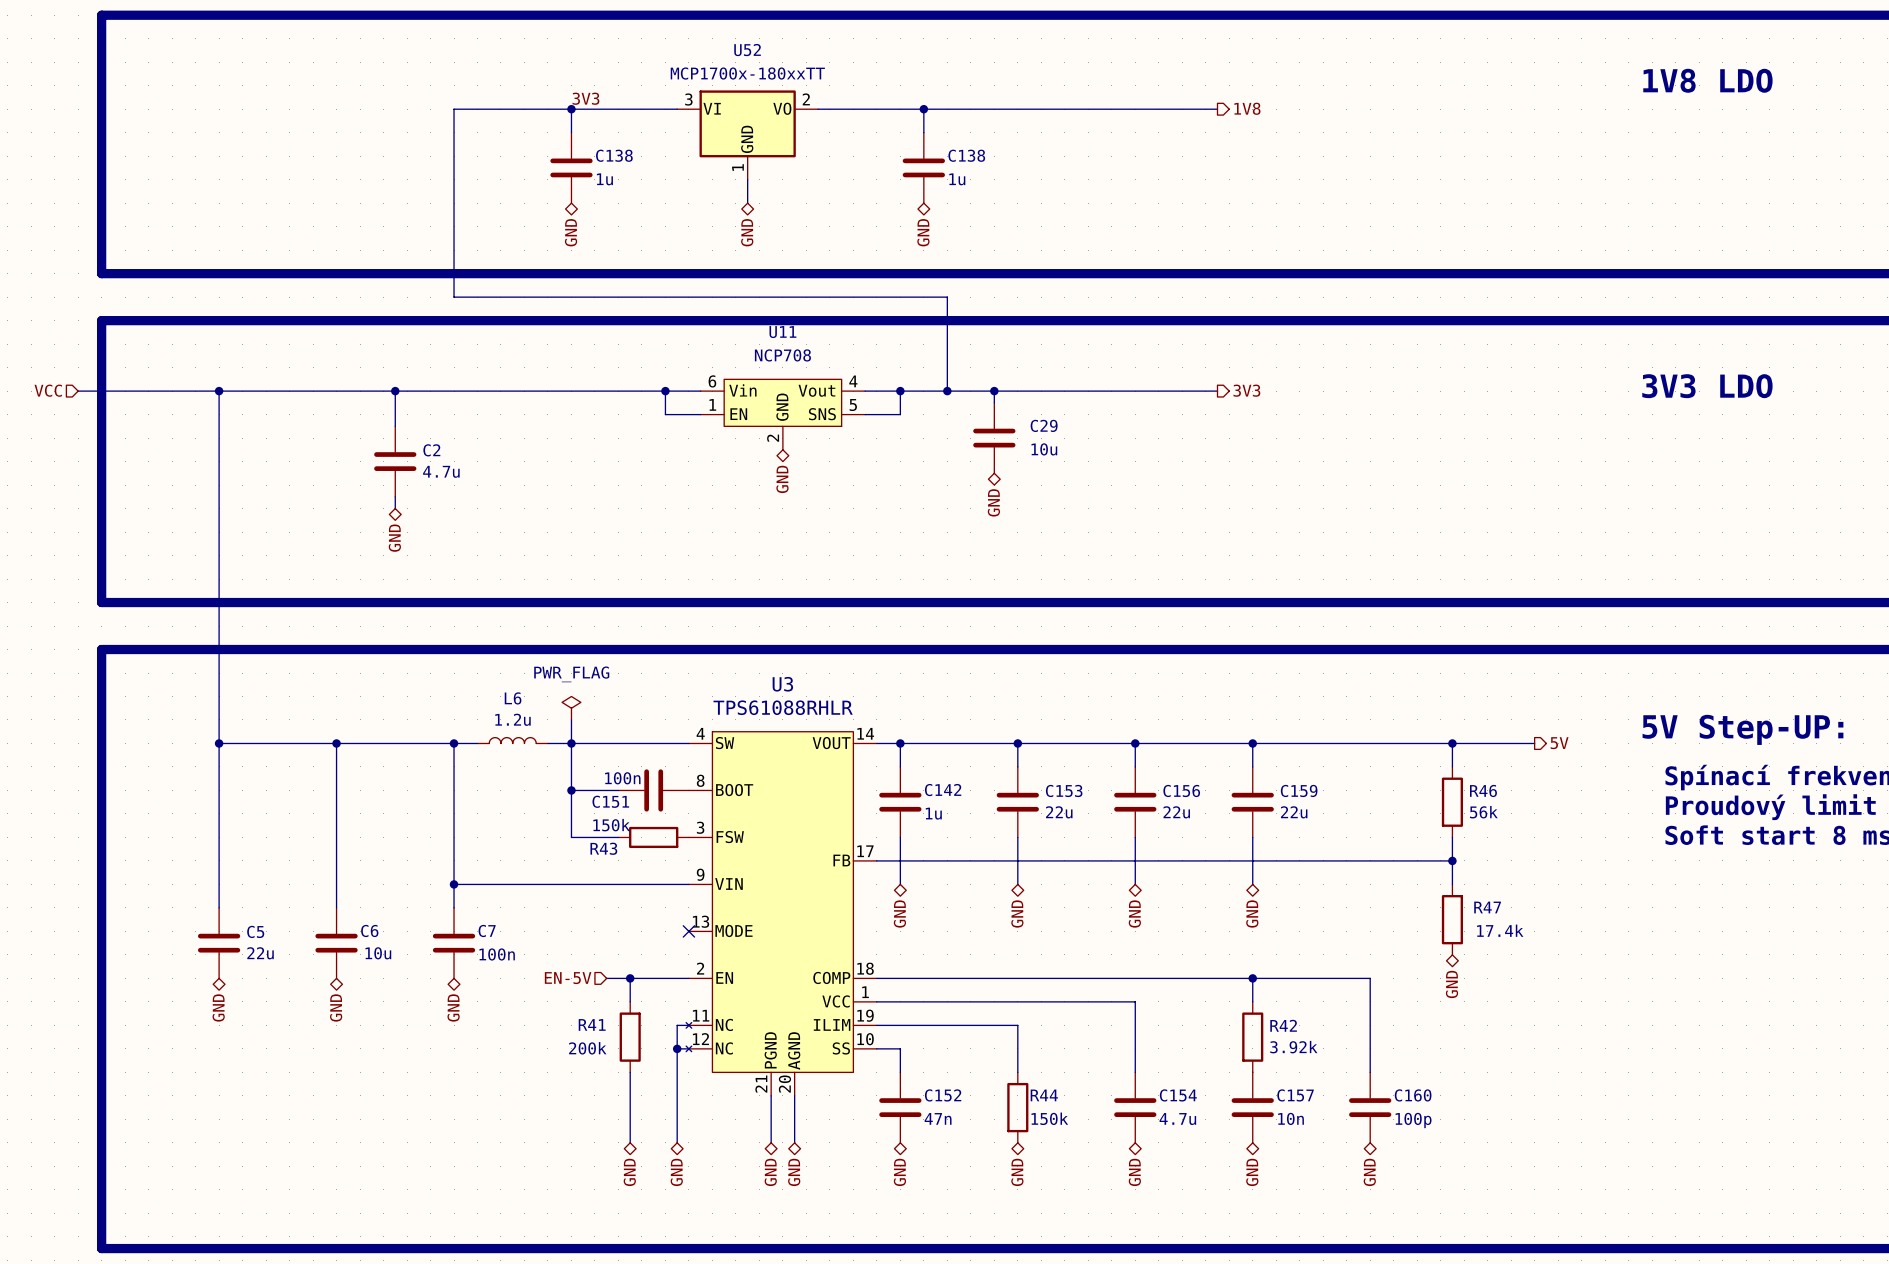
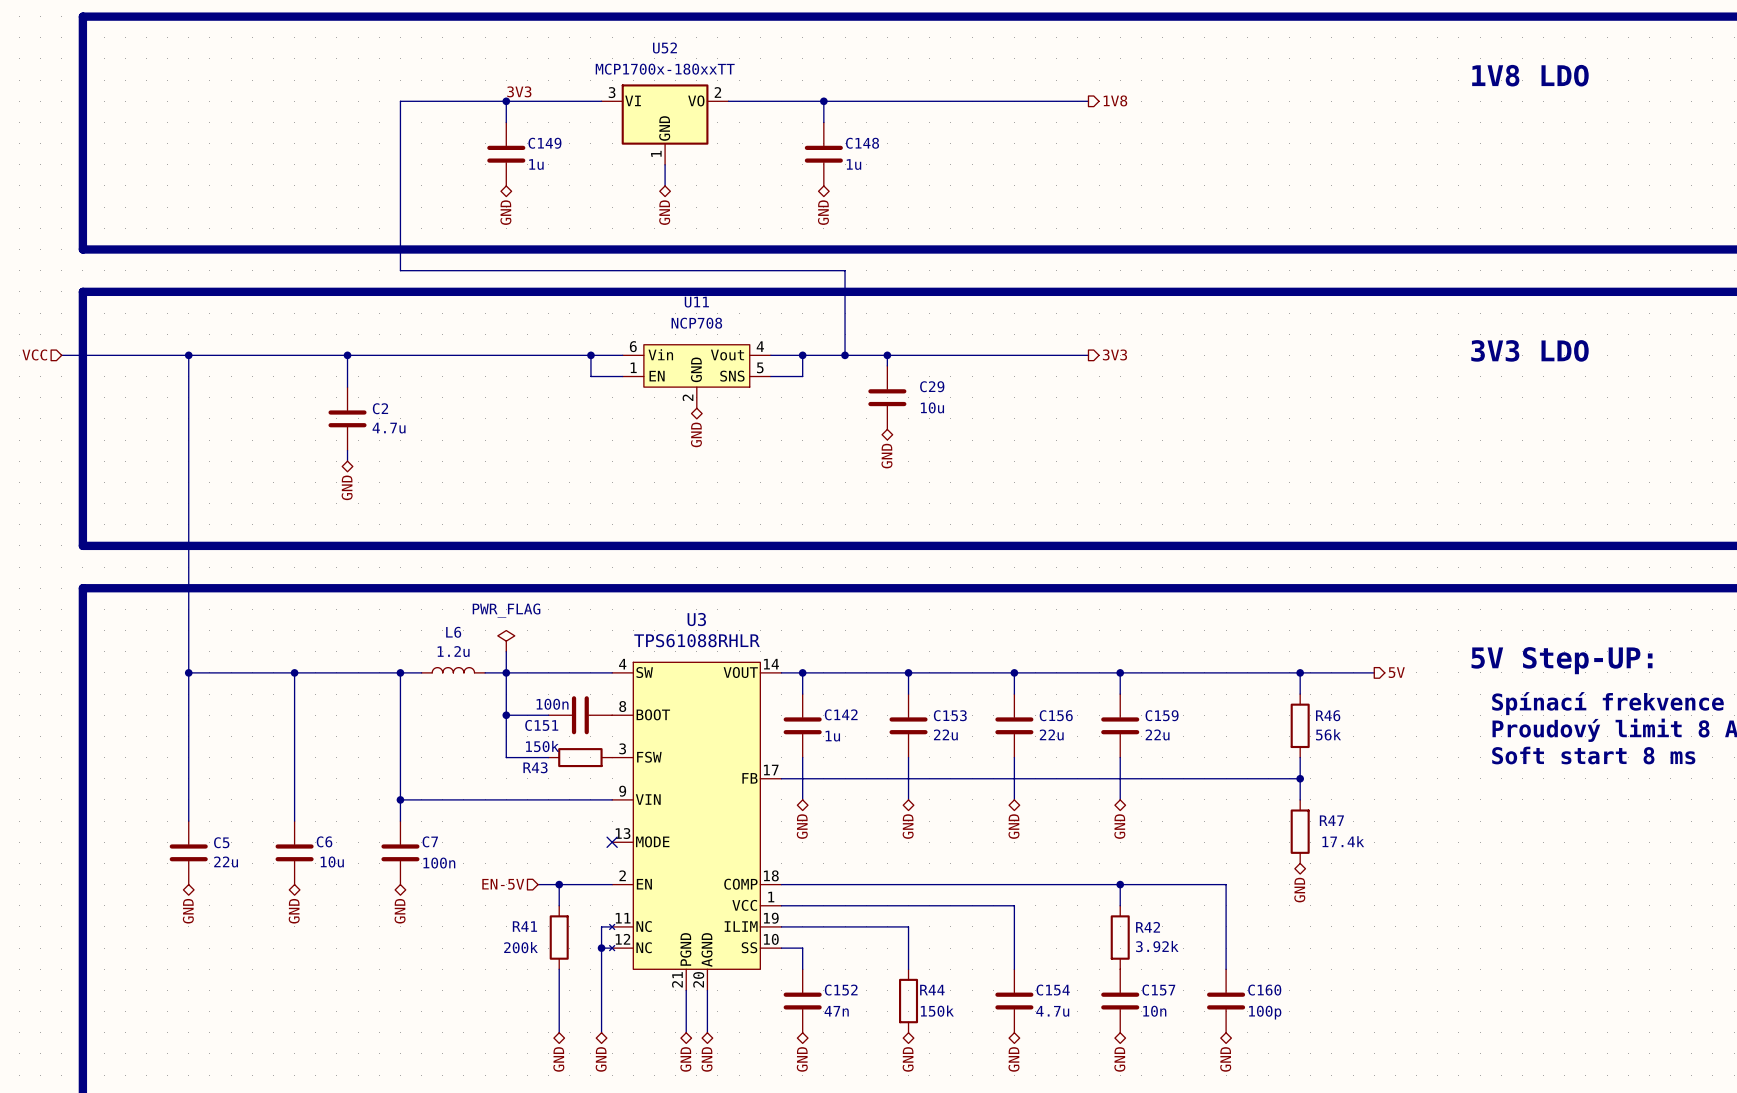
C138 name: C138 (614, 155) -> C149 (544, 143)
C138 name: C138 (966, 155) -> C148 (862, 143)

